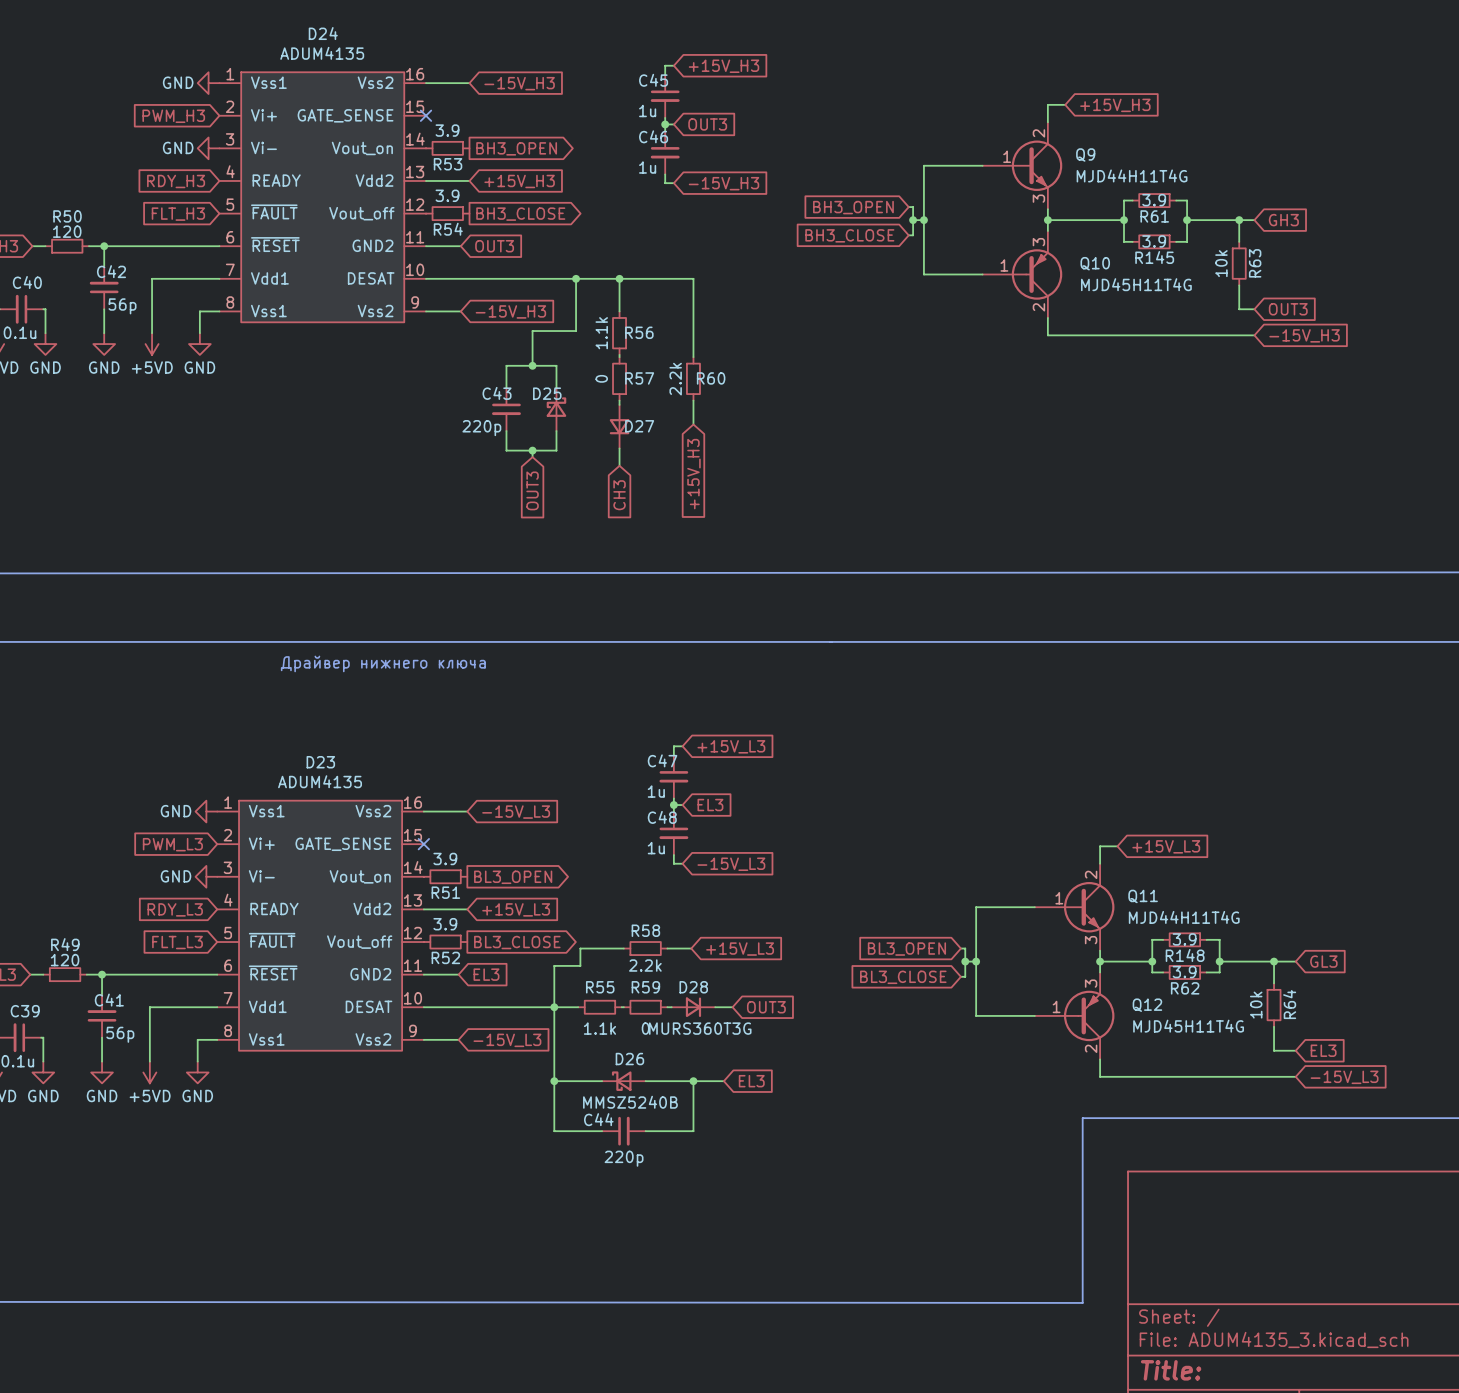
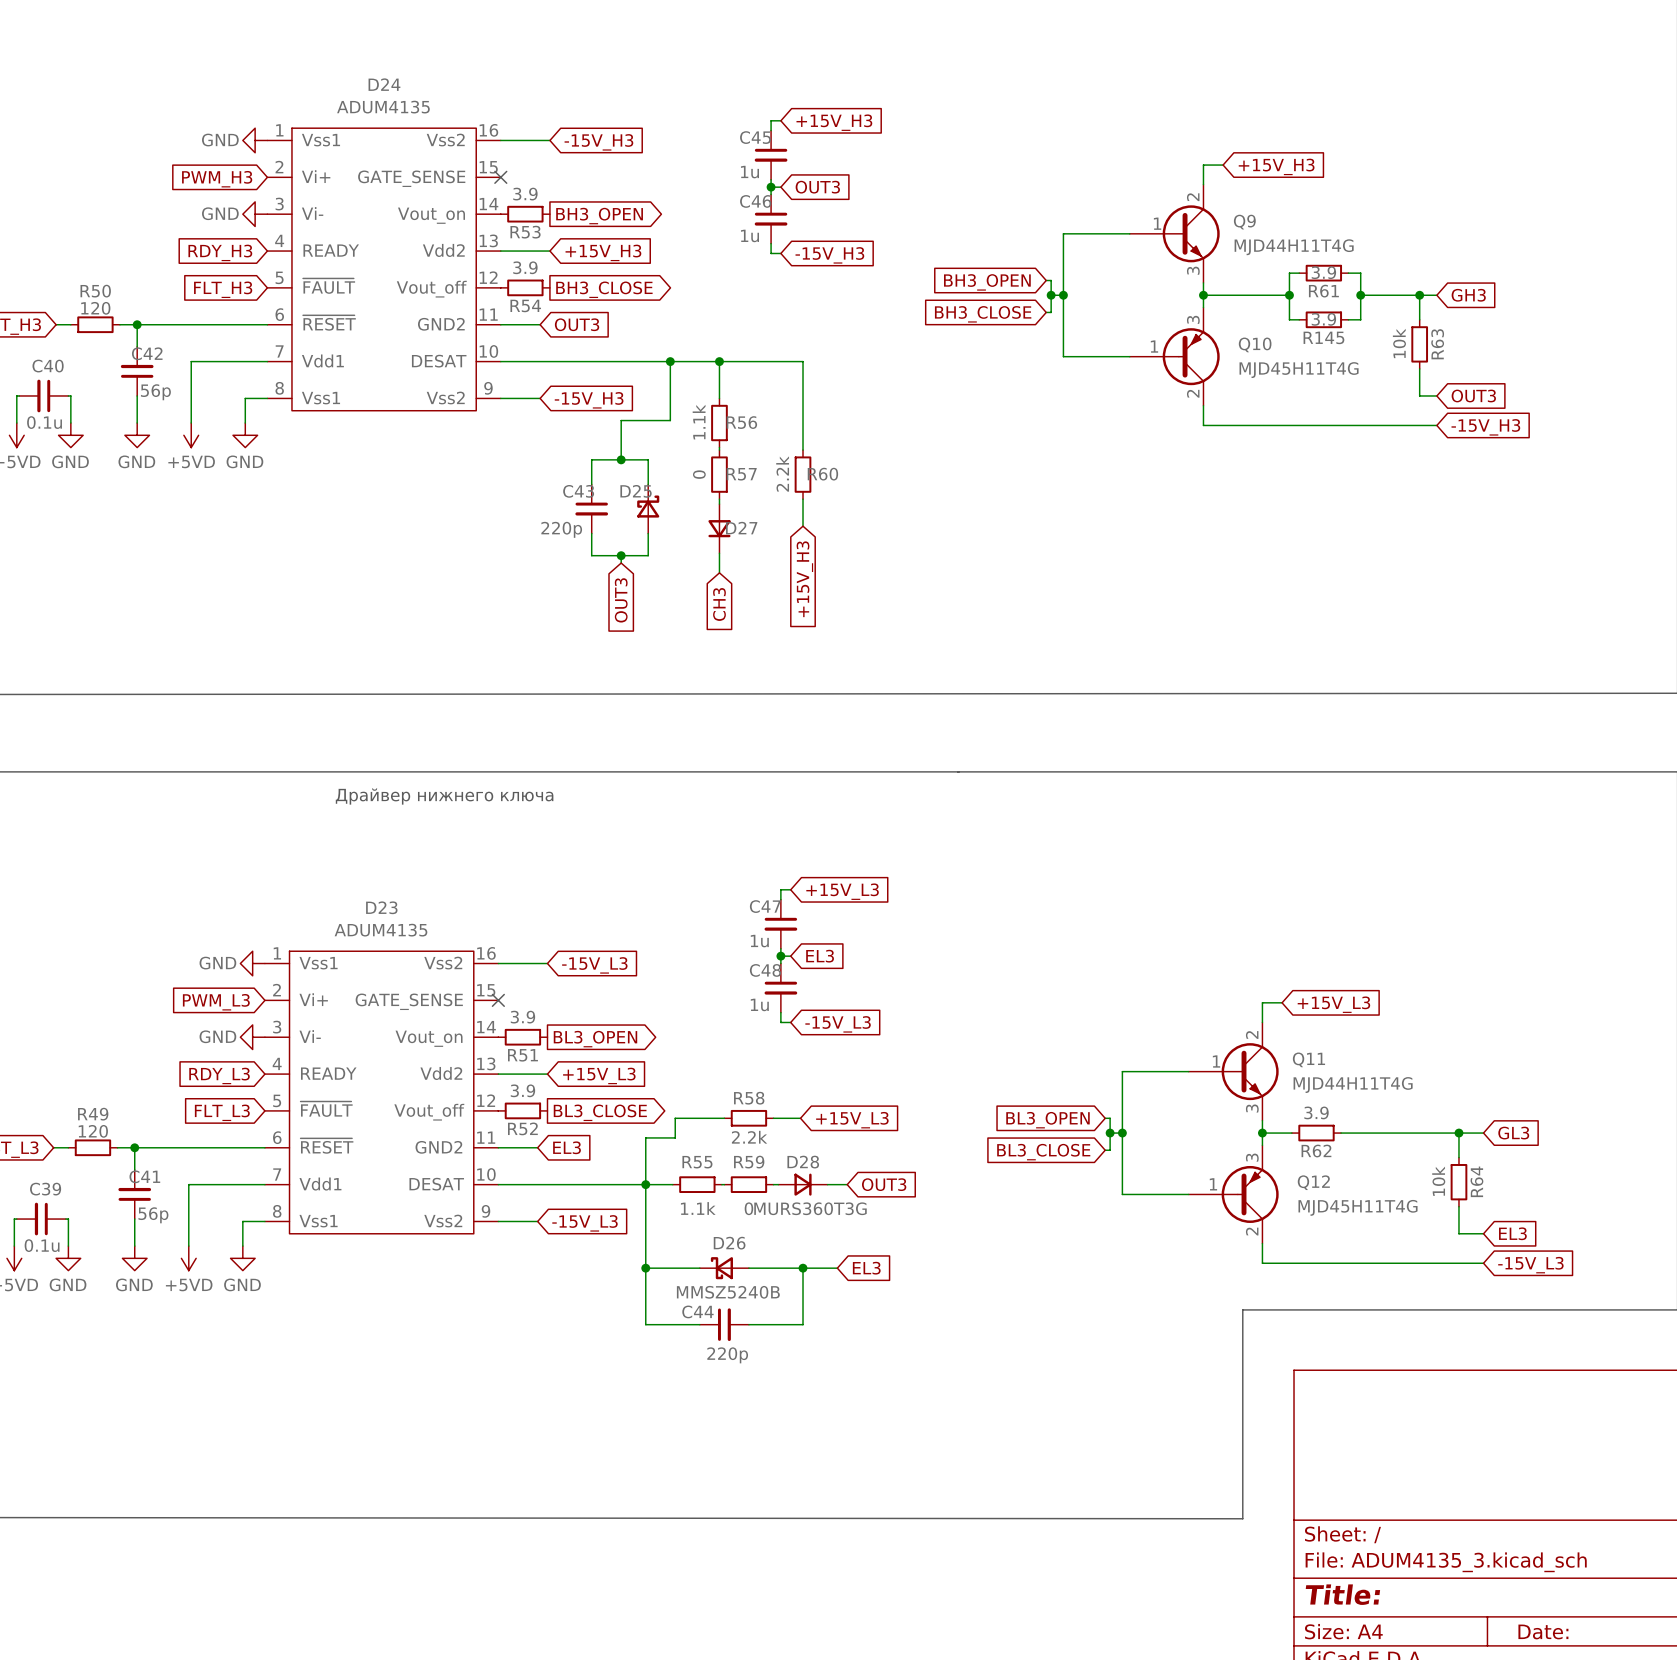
wire: (1163, 939) (1152, 939) (1152, 972) (1163, 972) -> none
R148: 3.9 (1184, 939) -> none
wire: (1206, 939) (1219, 939) (1219, 972) (1206, 972) -> none
wire: (1126, 961) (1152, 961) -> none
junction: (1152, 961) -> none
wire: none -> (1341, 1133) (1397, 1133)
junction: (1219, 961) -> none
R62 position: (1184, 972) -> (1316, 1133)
R62 value position: 3.9 (1184, 972) -> 3.9 (1316, 1112)

